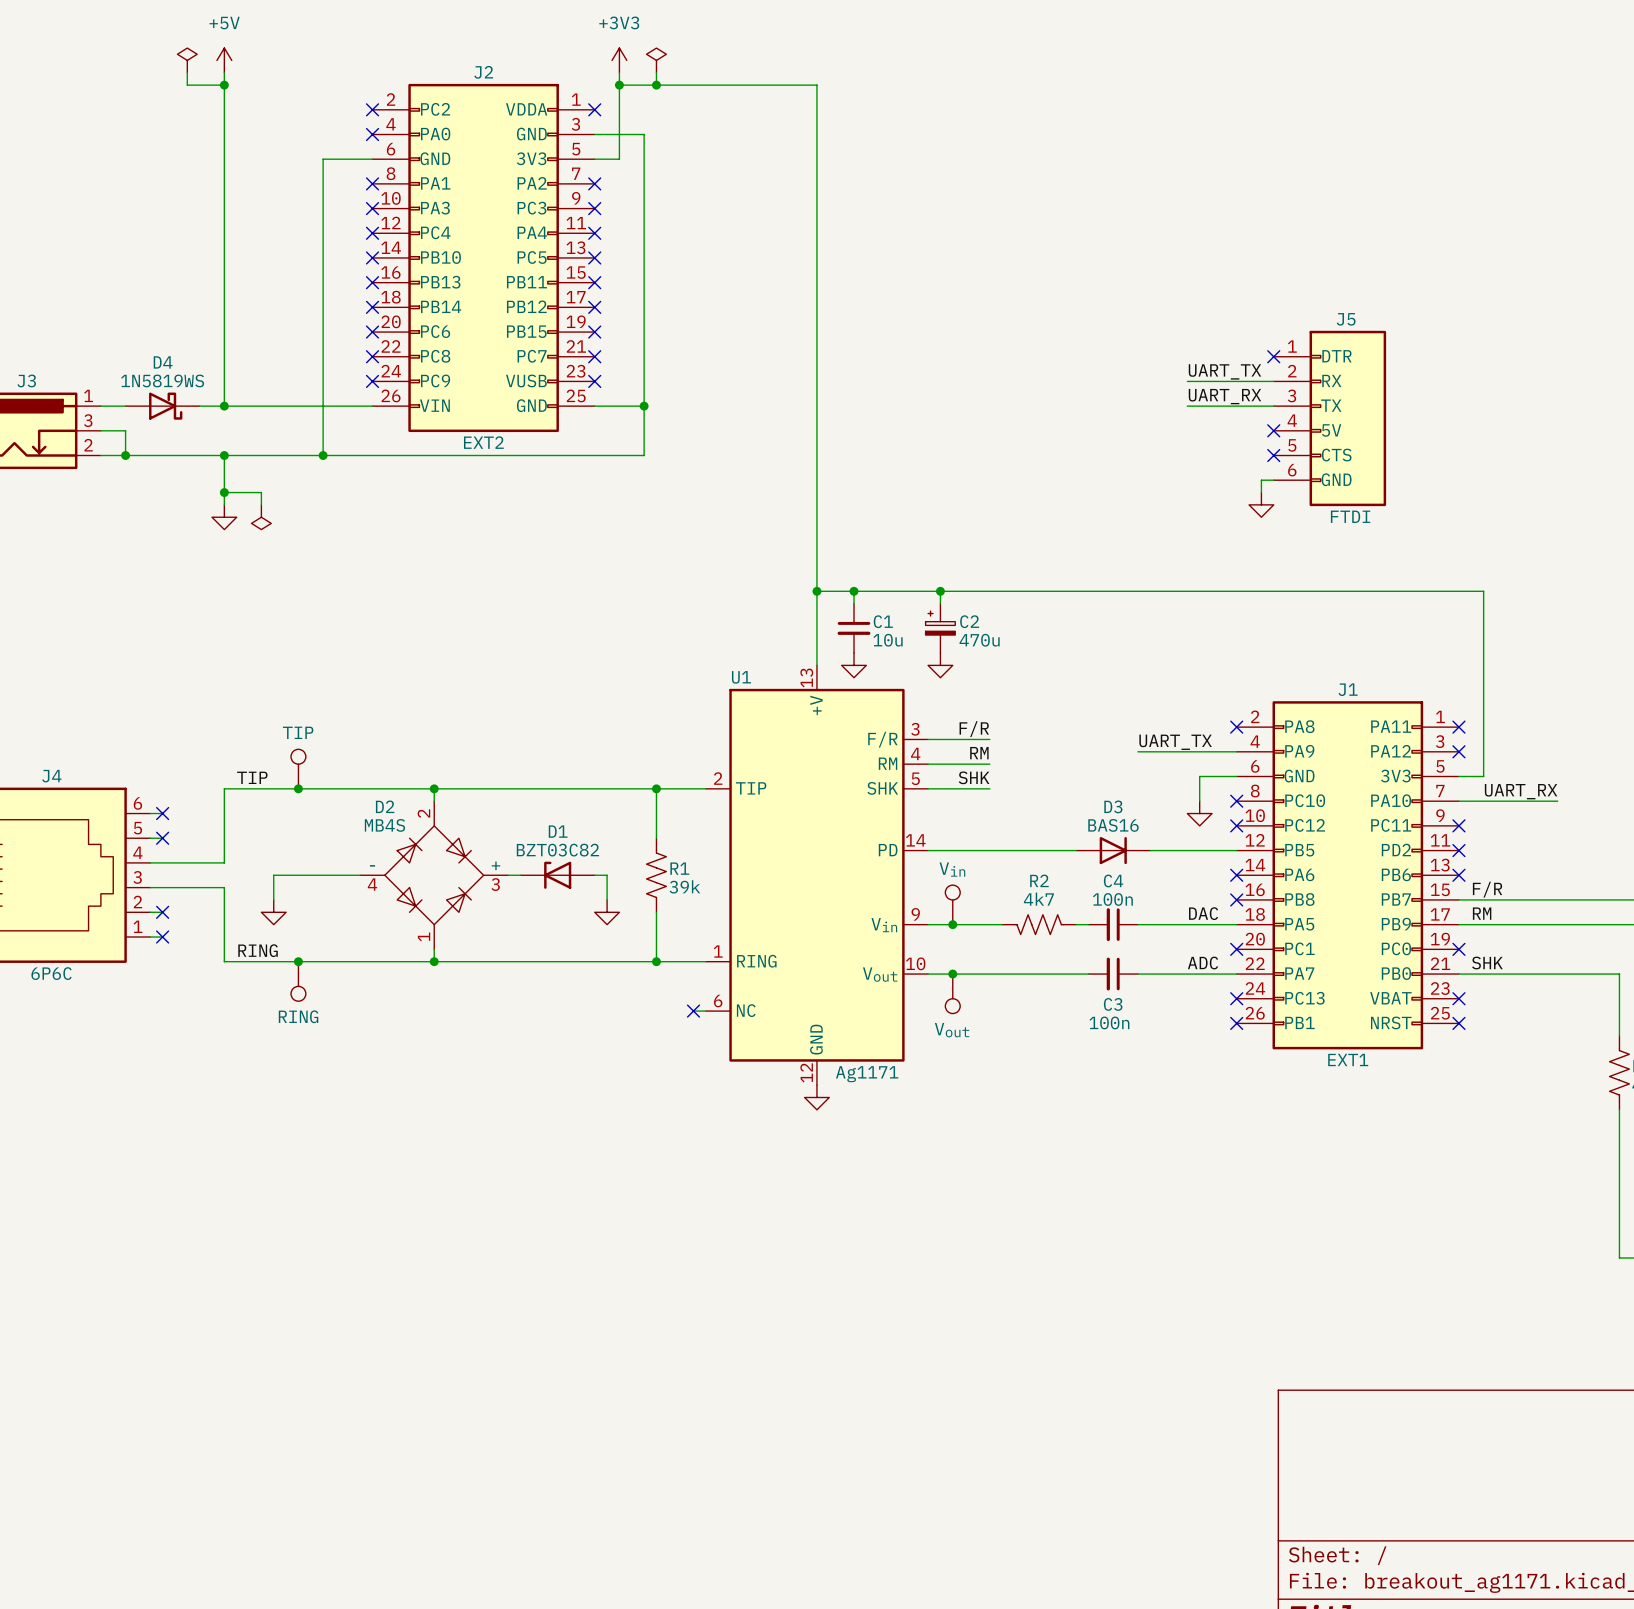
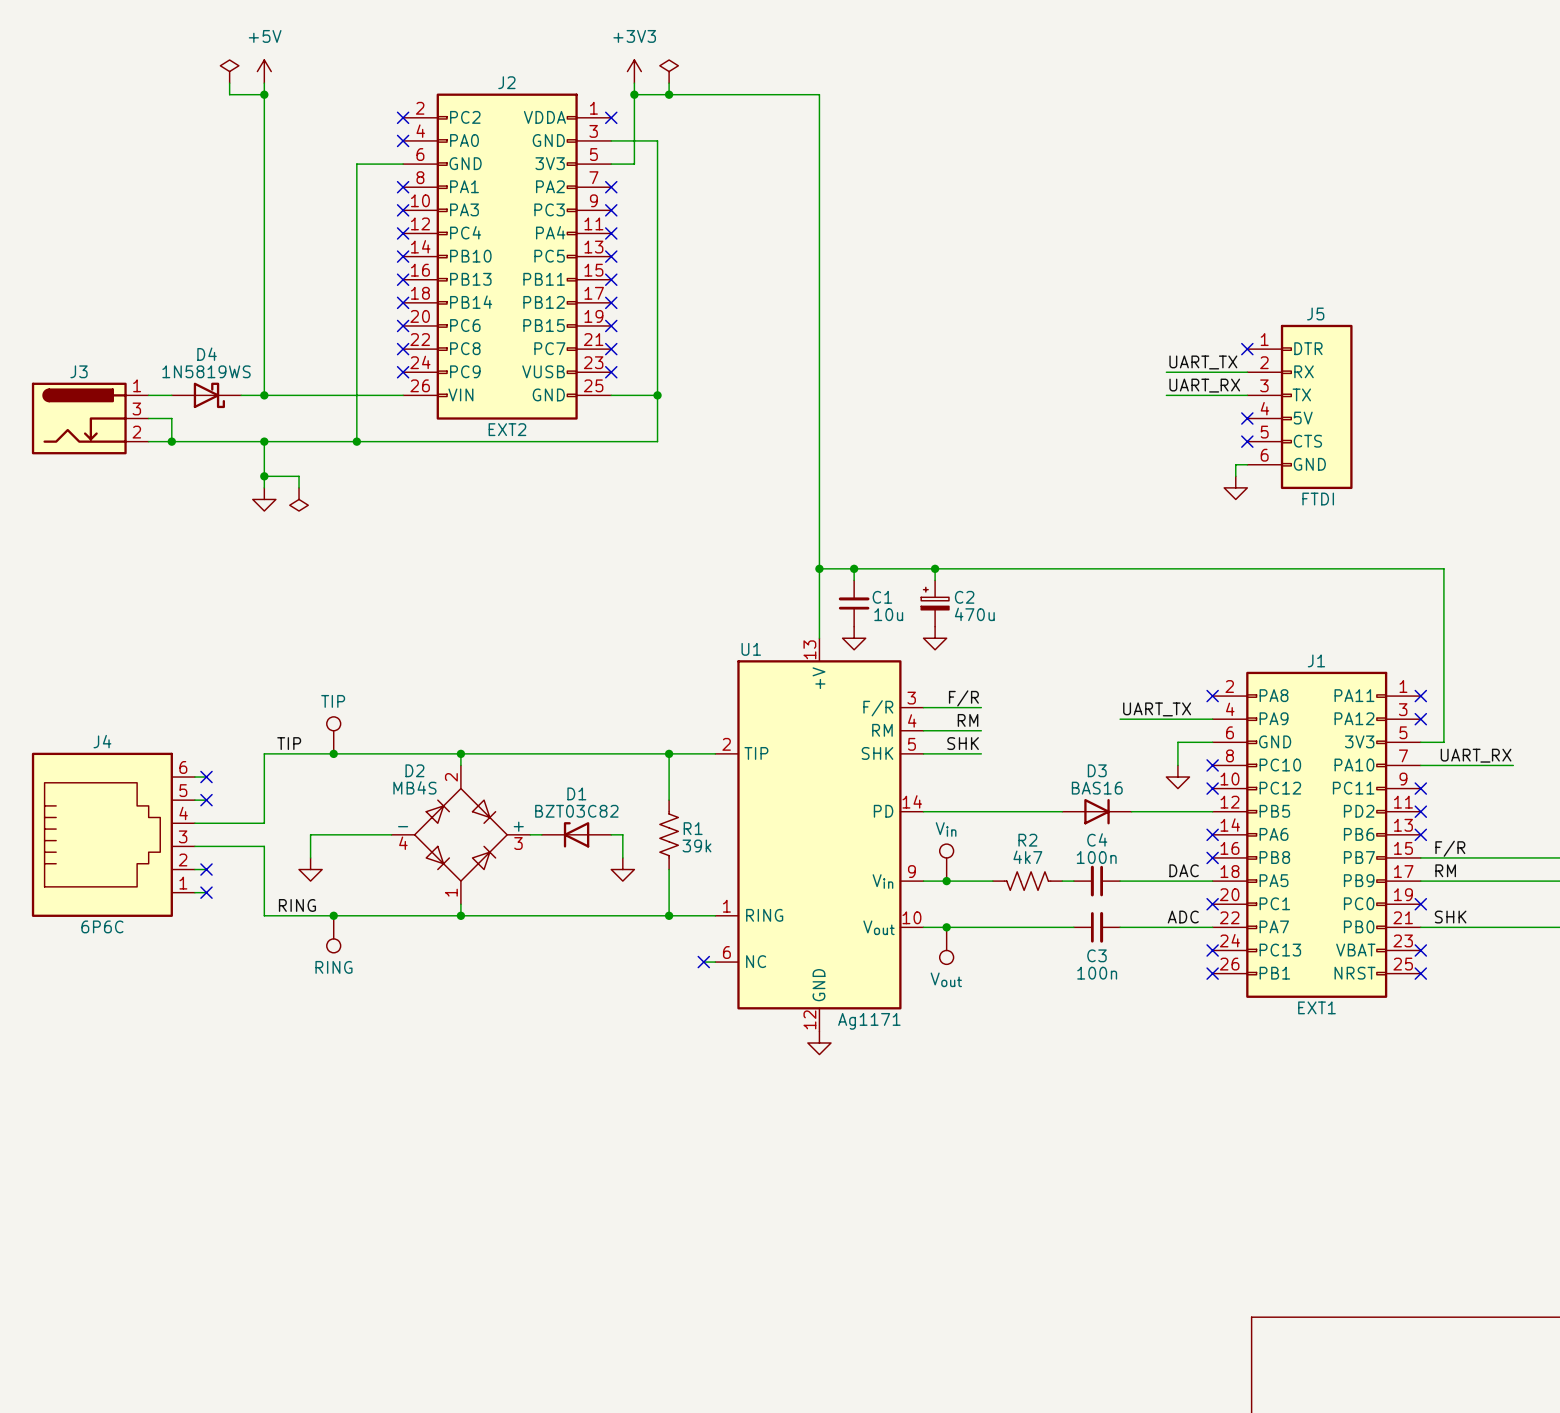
C1 rotation: 0° (854, 628) -> 180° (854, 603)
C3 rotation: 0° (1113, 974) -> 180° (1097, 927)

